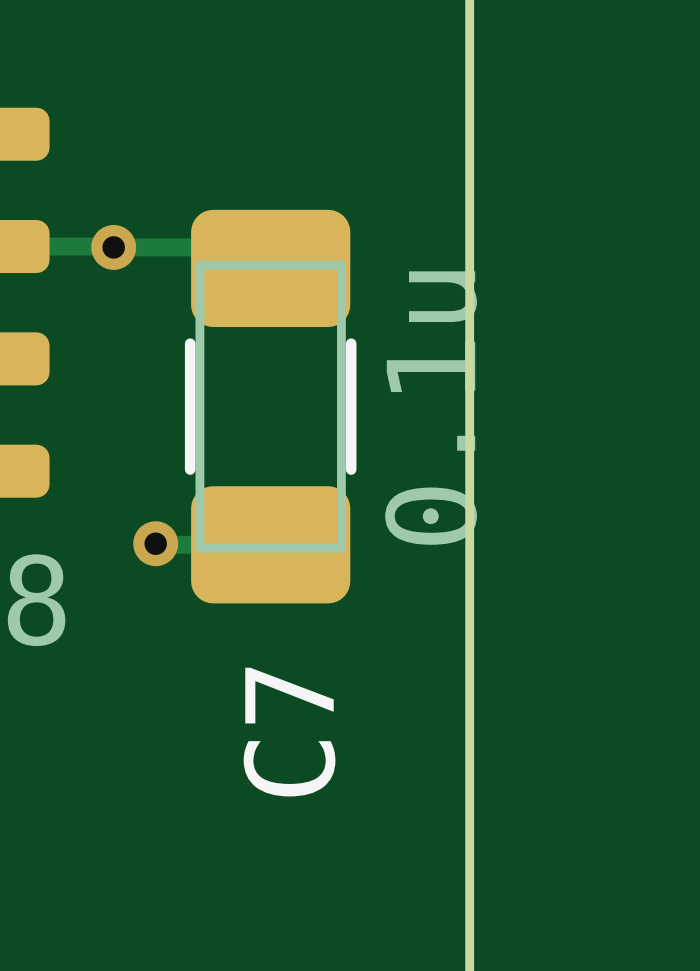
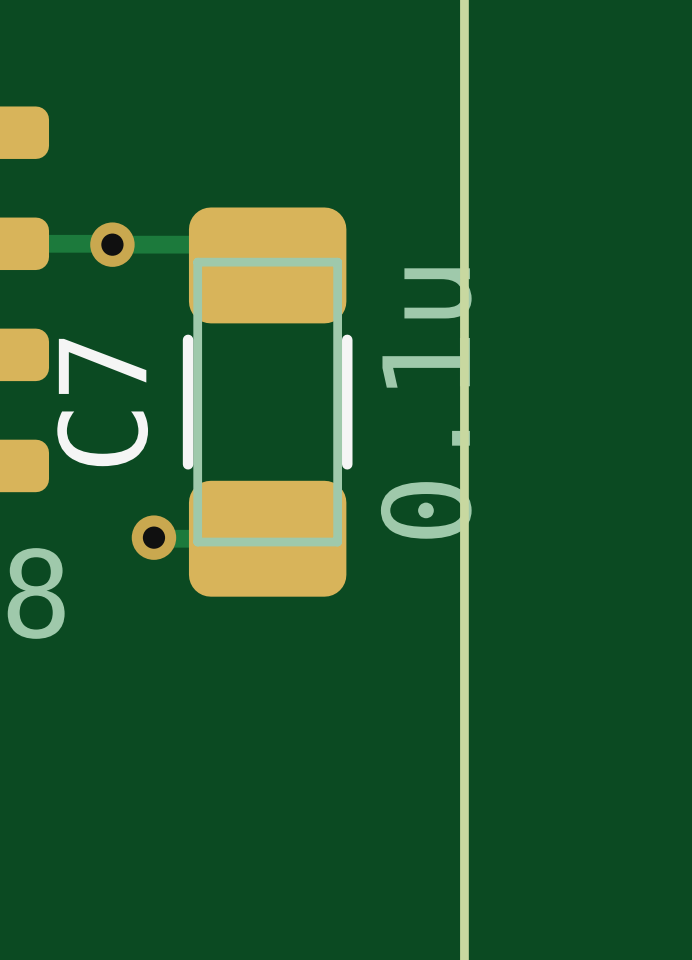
C7 name position: C7 (289, 732) -> C7 (102, 402)

